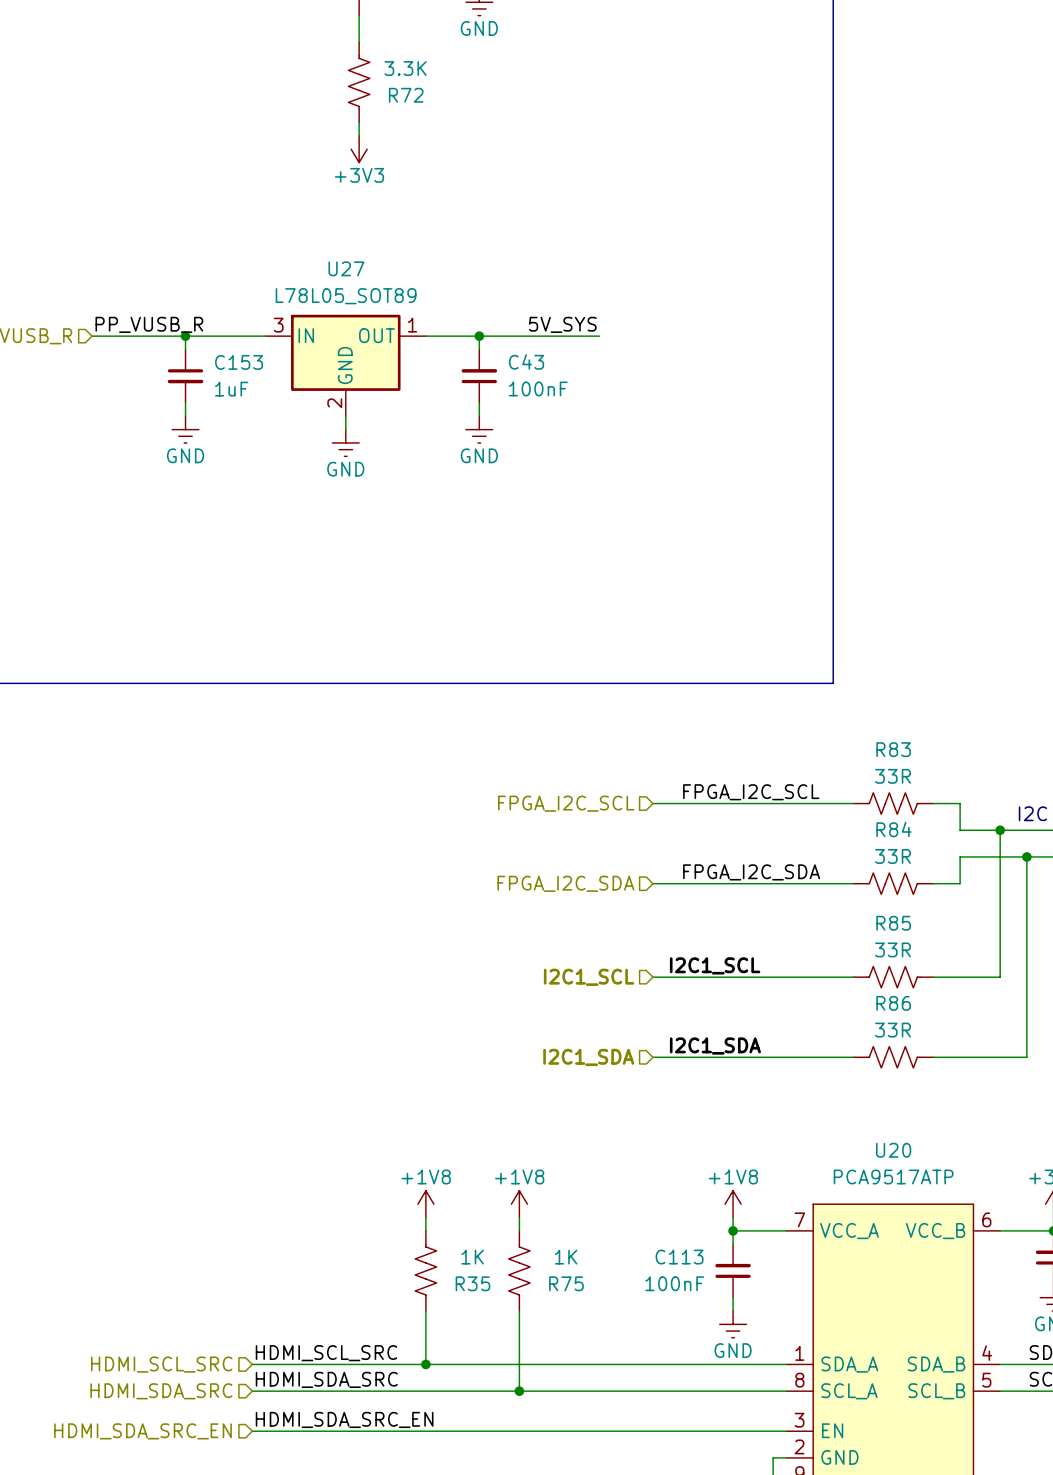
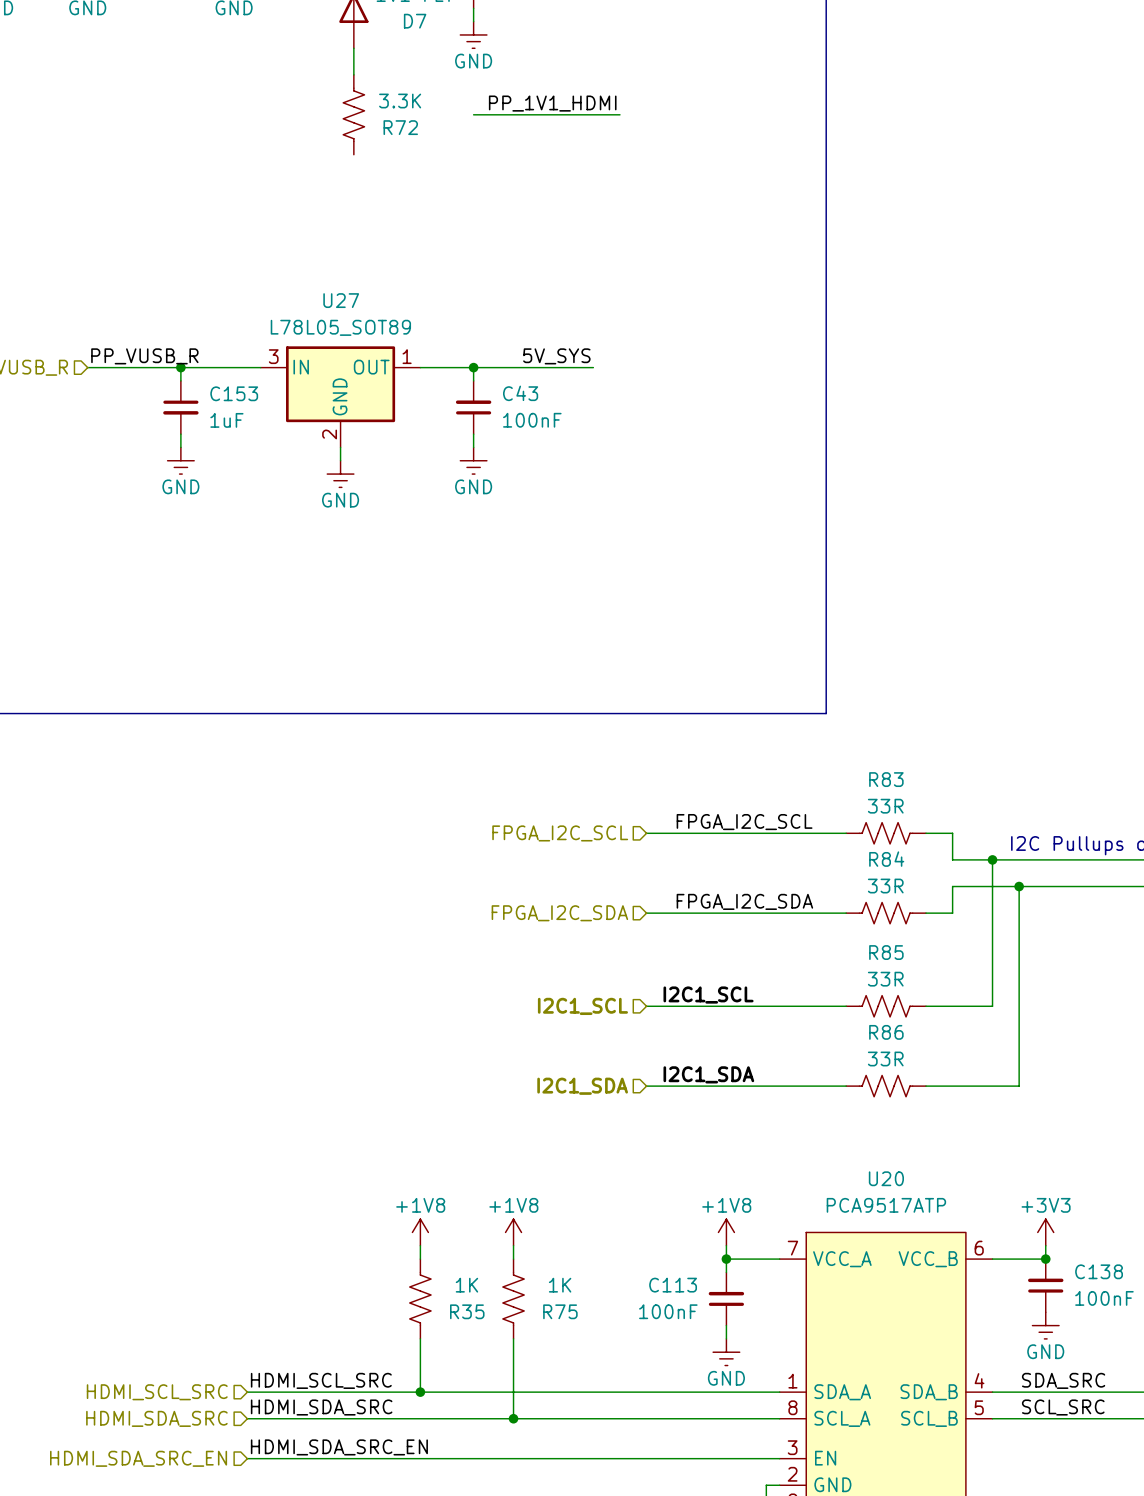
label: none -> PP_1V1_HDMI (552, 103)
wire: none -> (473, 114) (619, 114)
wire: (359, 122) (359, 135) -> none
power symbol: +3V3 (359, 149) -> none

